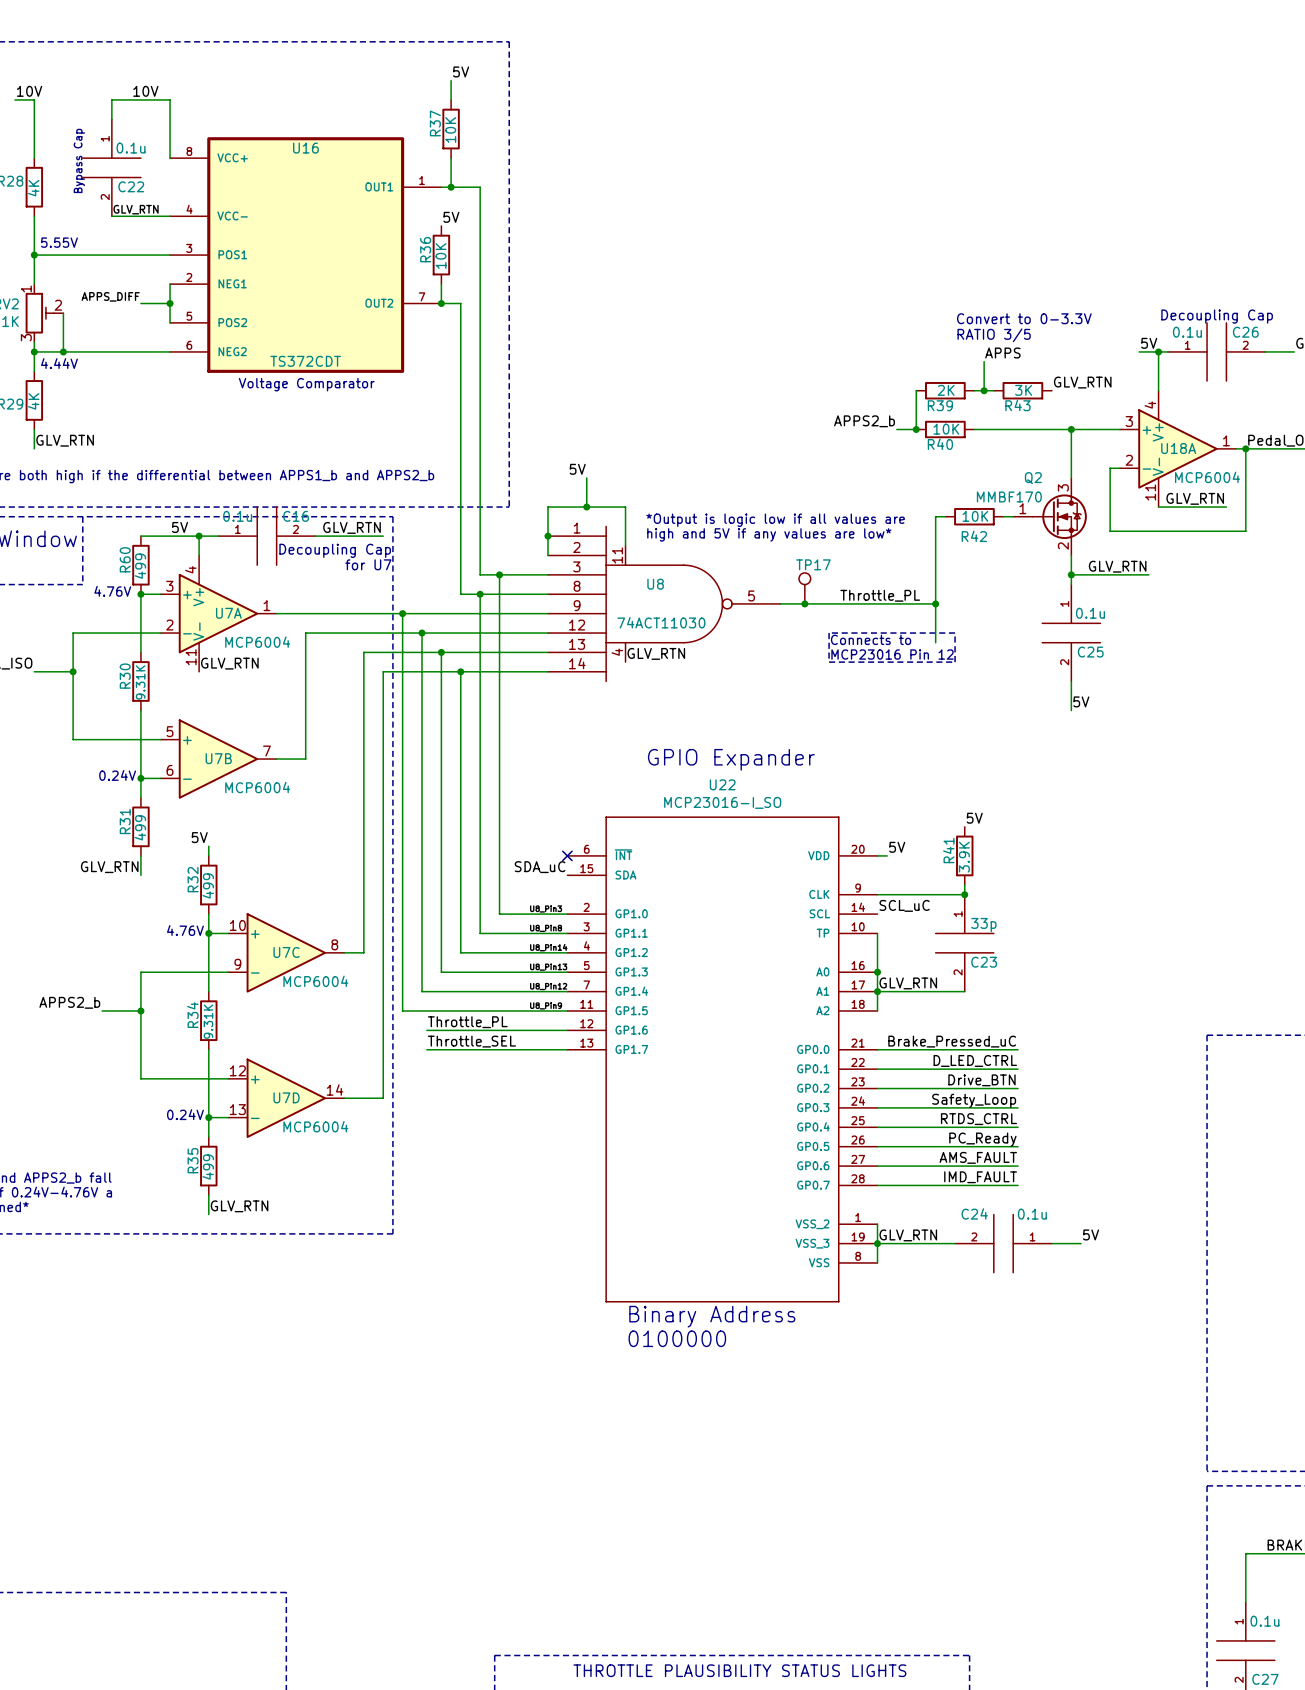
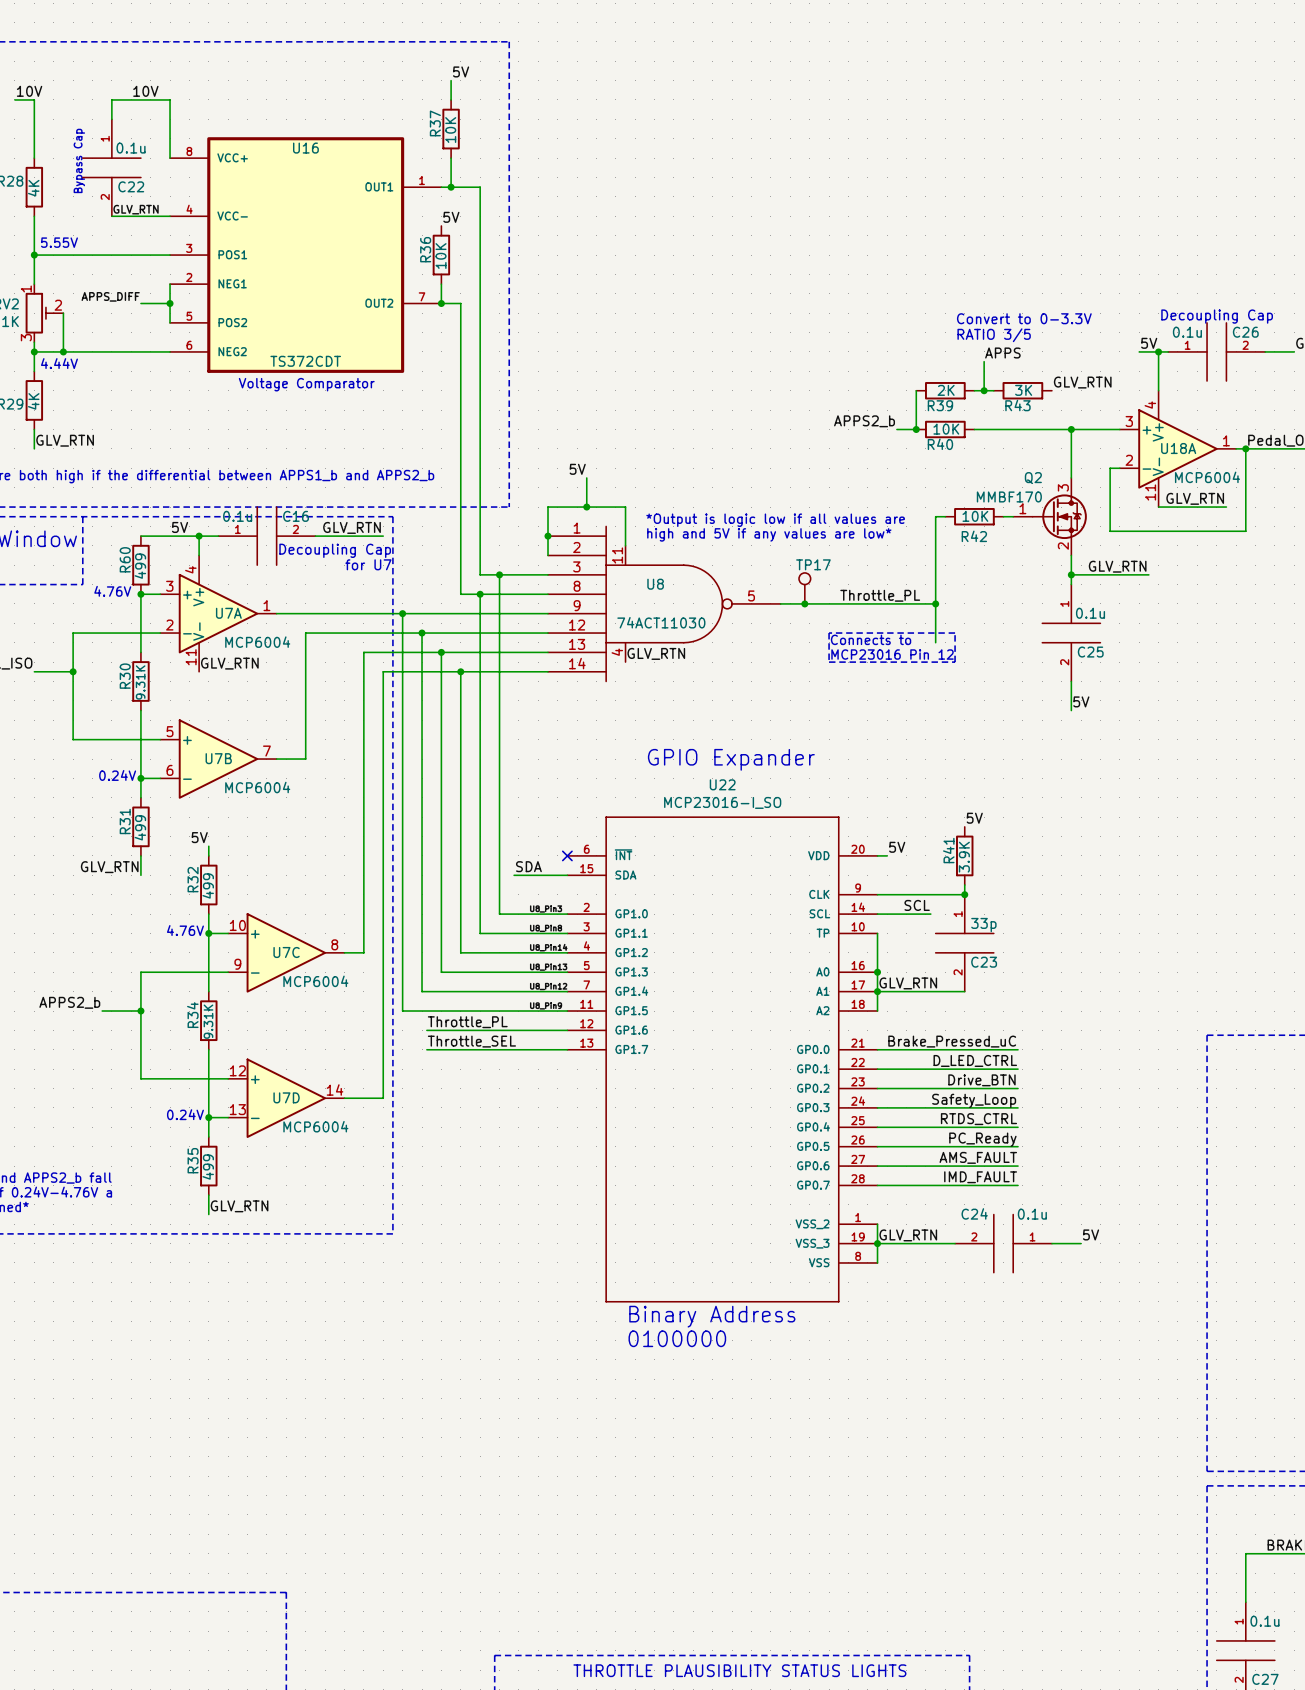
label: SDA_uC (540, 867) -> SDA (528, 866)
wire: none -> (514, 875) (567, 875)
label: SCL_uC (904, 905) -> SCL (917, 905)
wire: none -> (877, 914) (930, 914)

